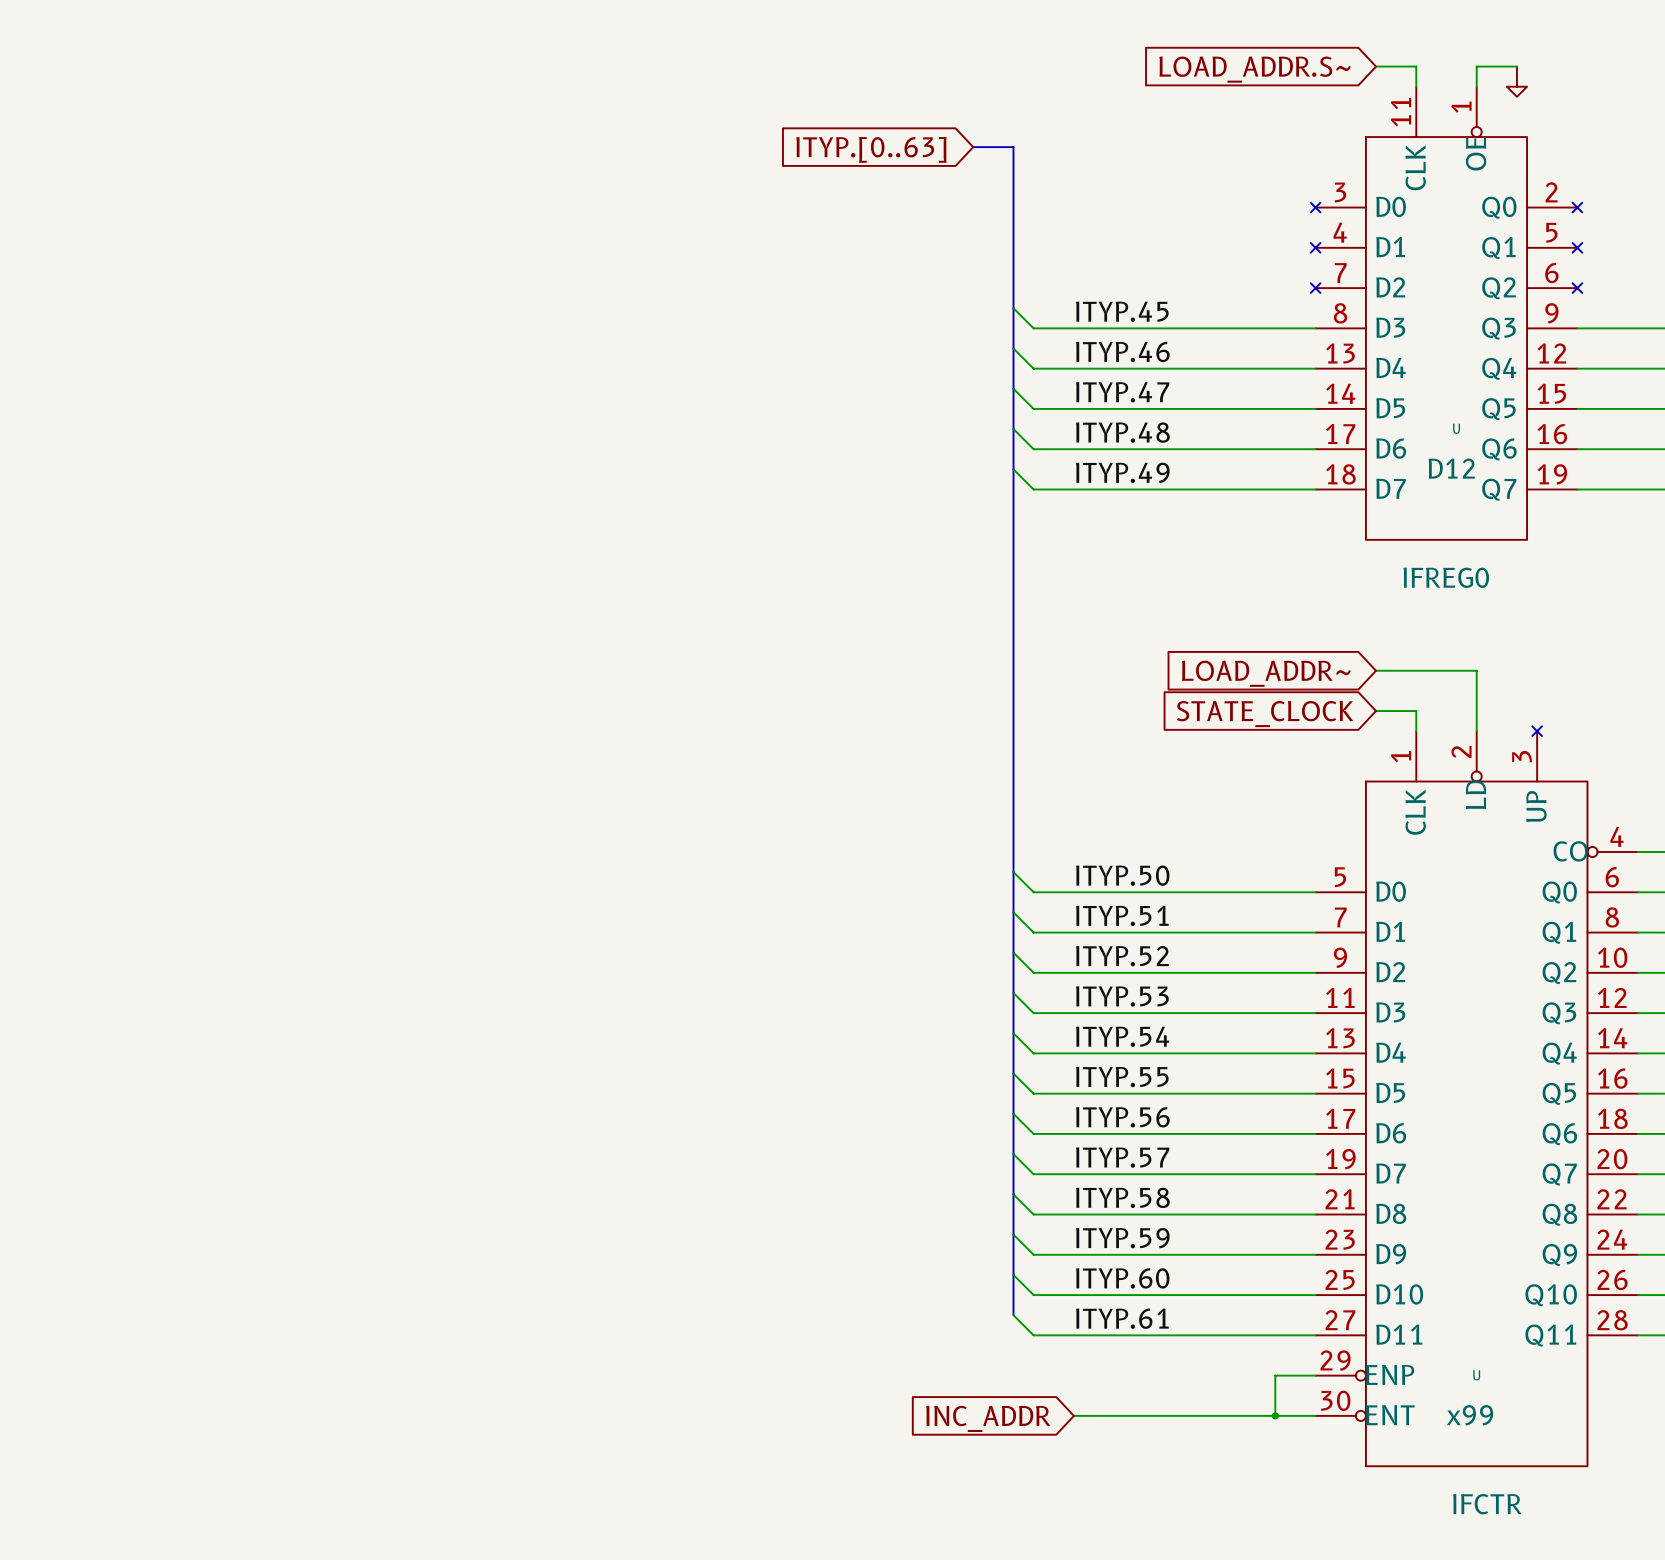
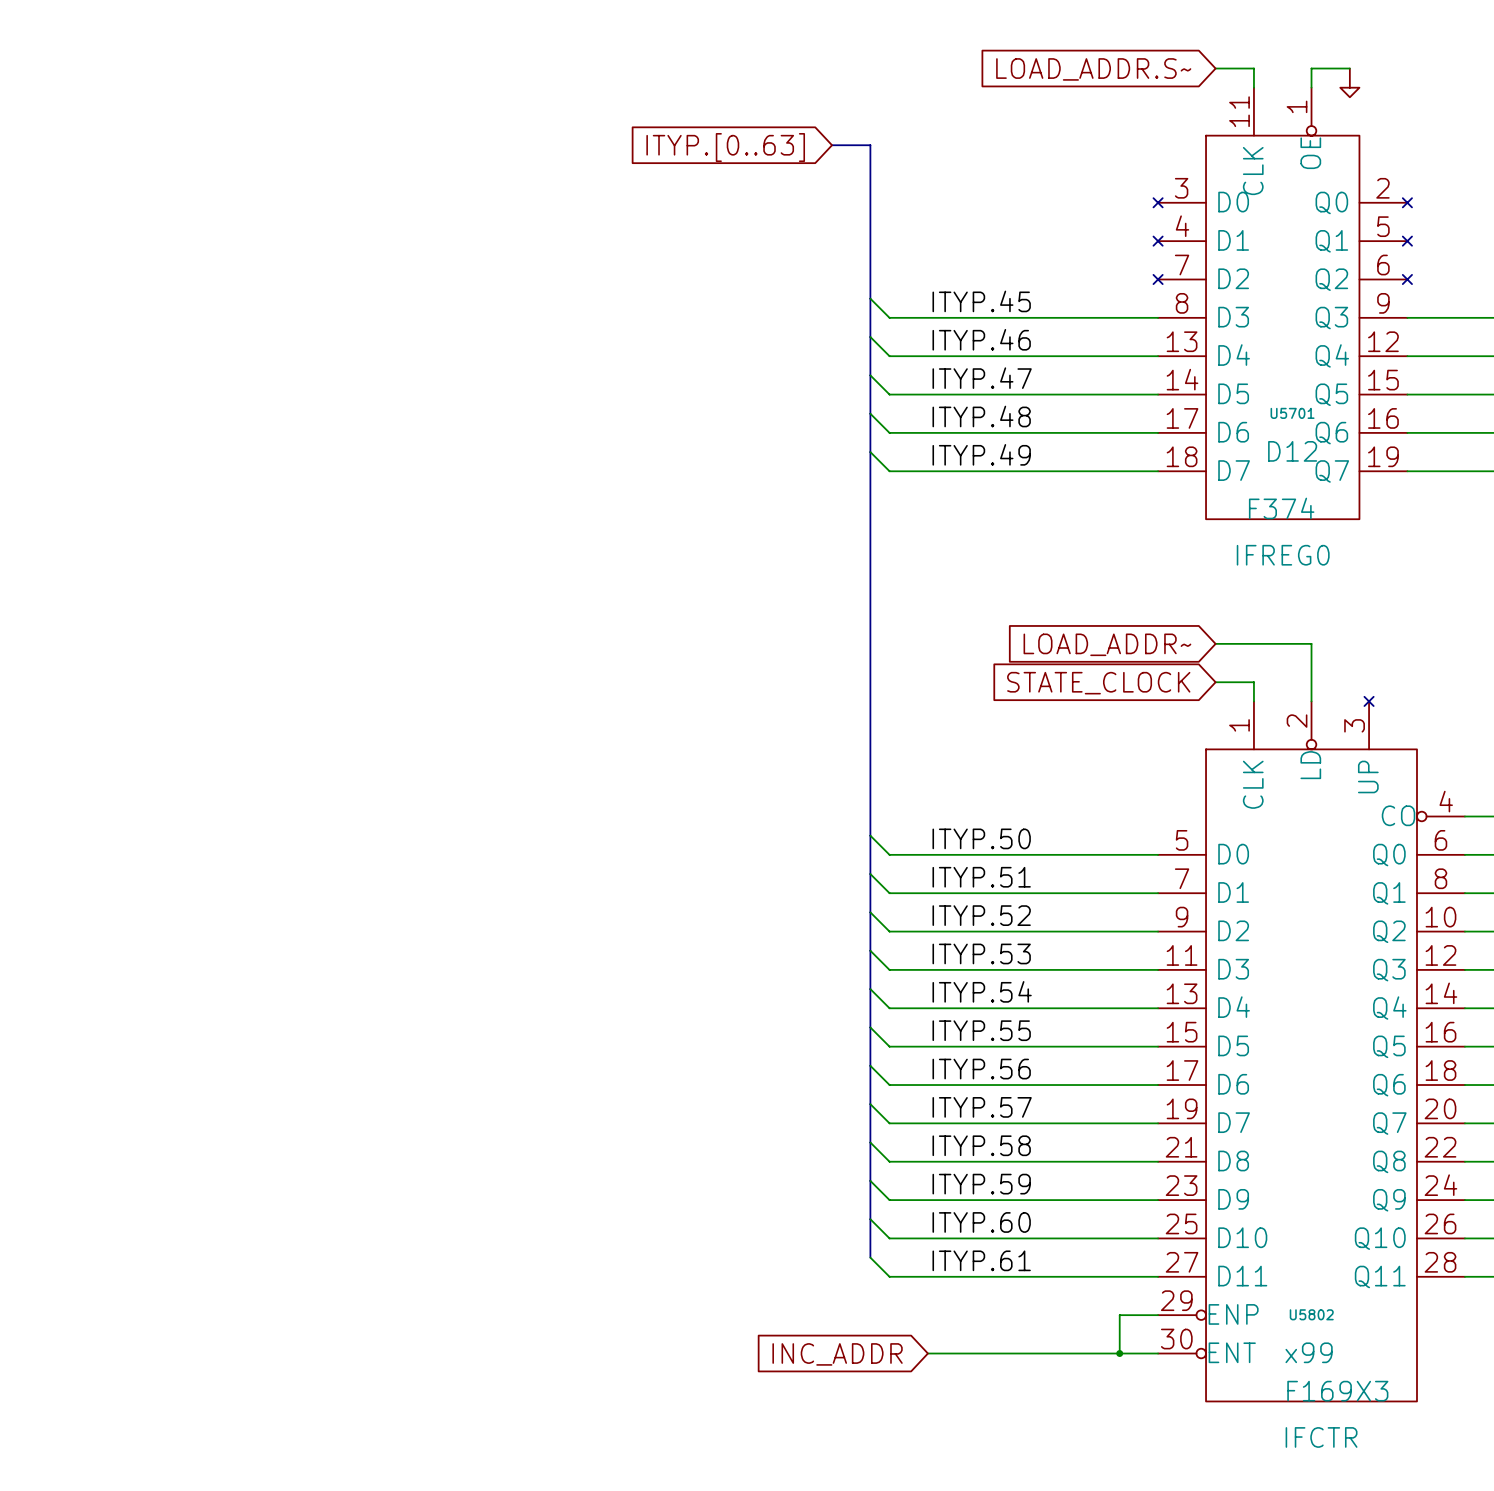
U name: U (1456, 428) -> U5701 (1292, 413)
U value: none -> F374 (1281, 508)
U name: U (1476, 1375) -> U5802 (1311, 1314)
U value: none -> F169X3 (1337, 1391)

